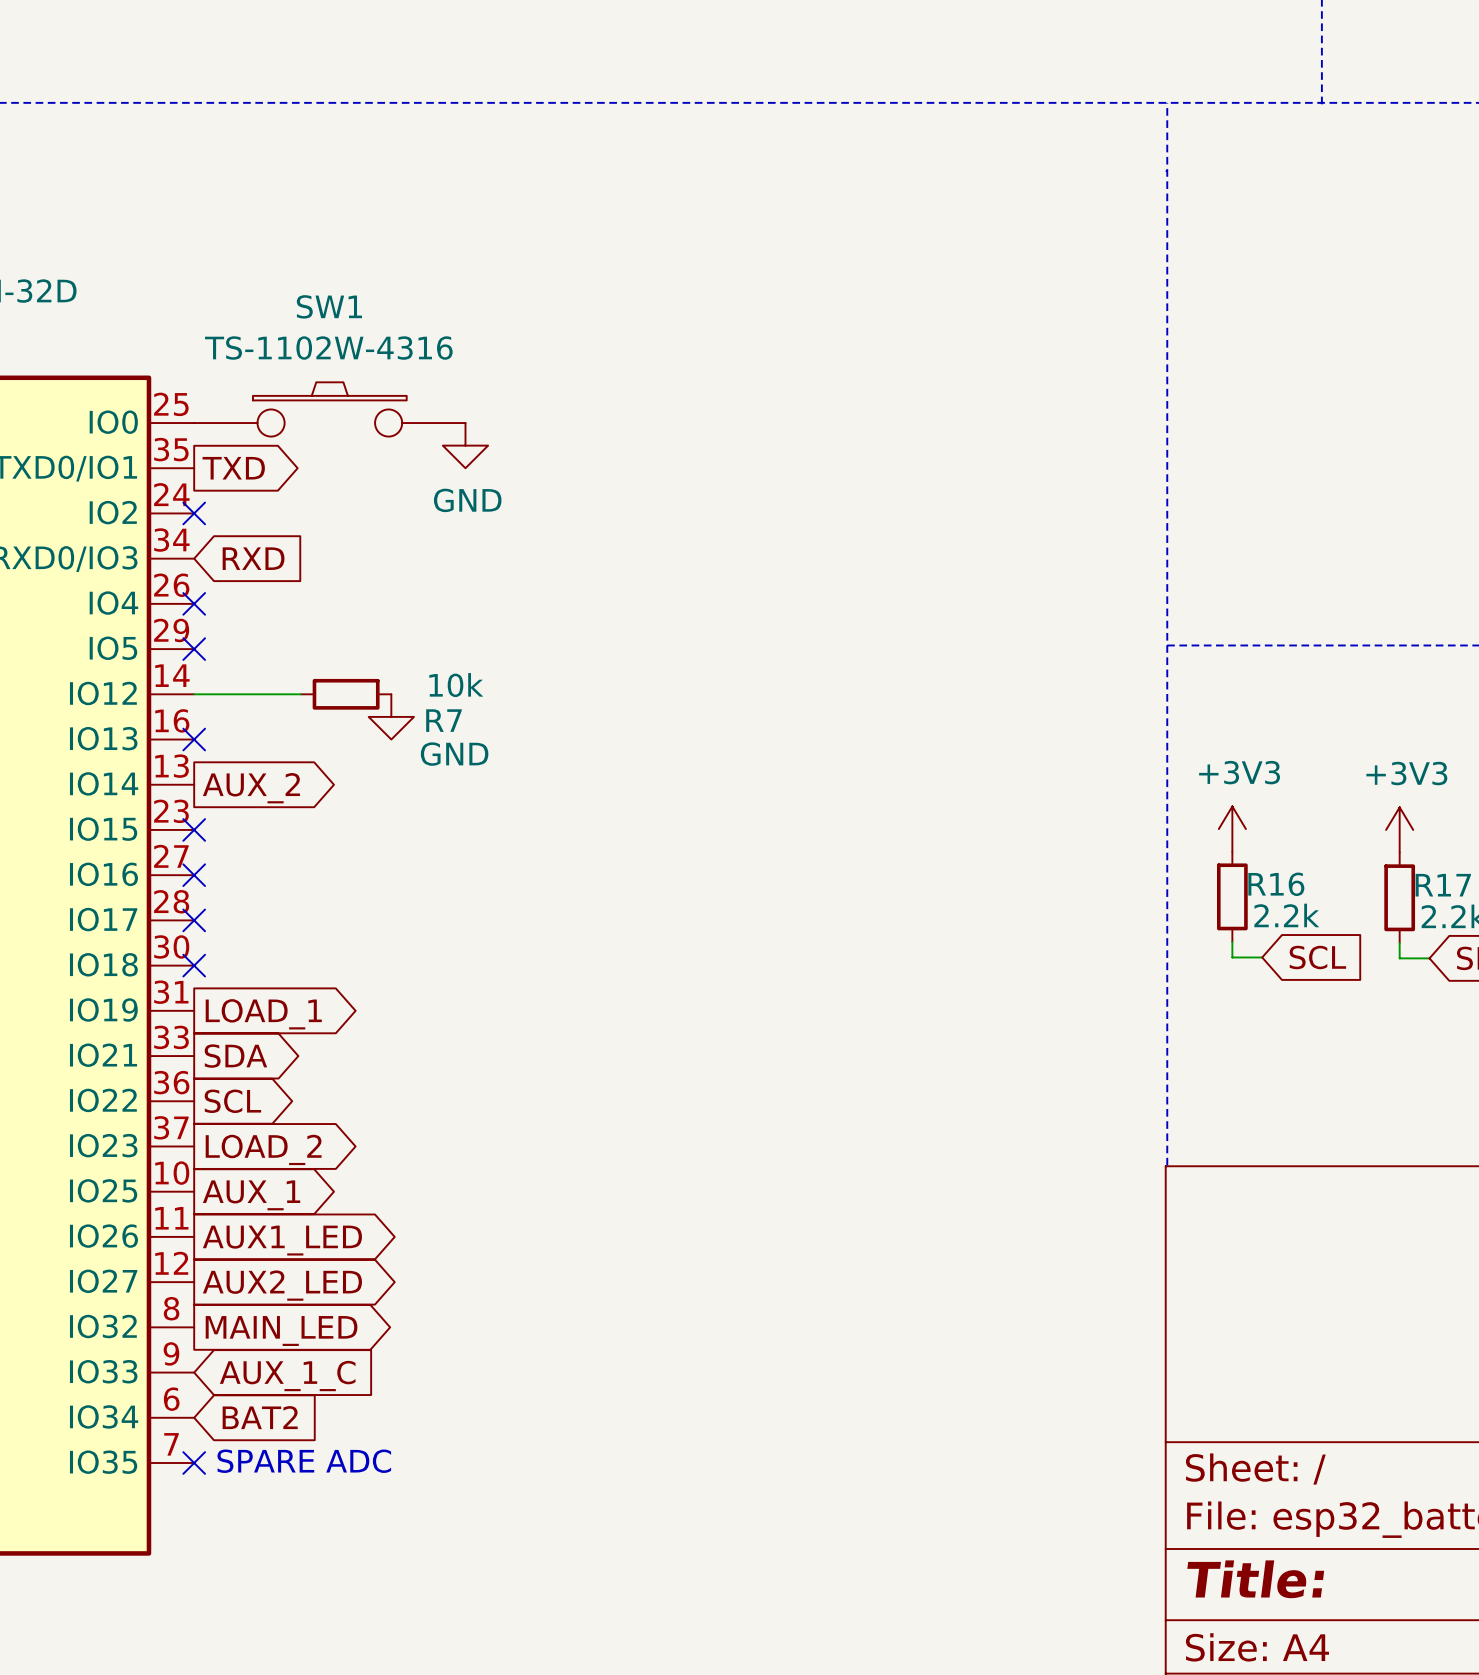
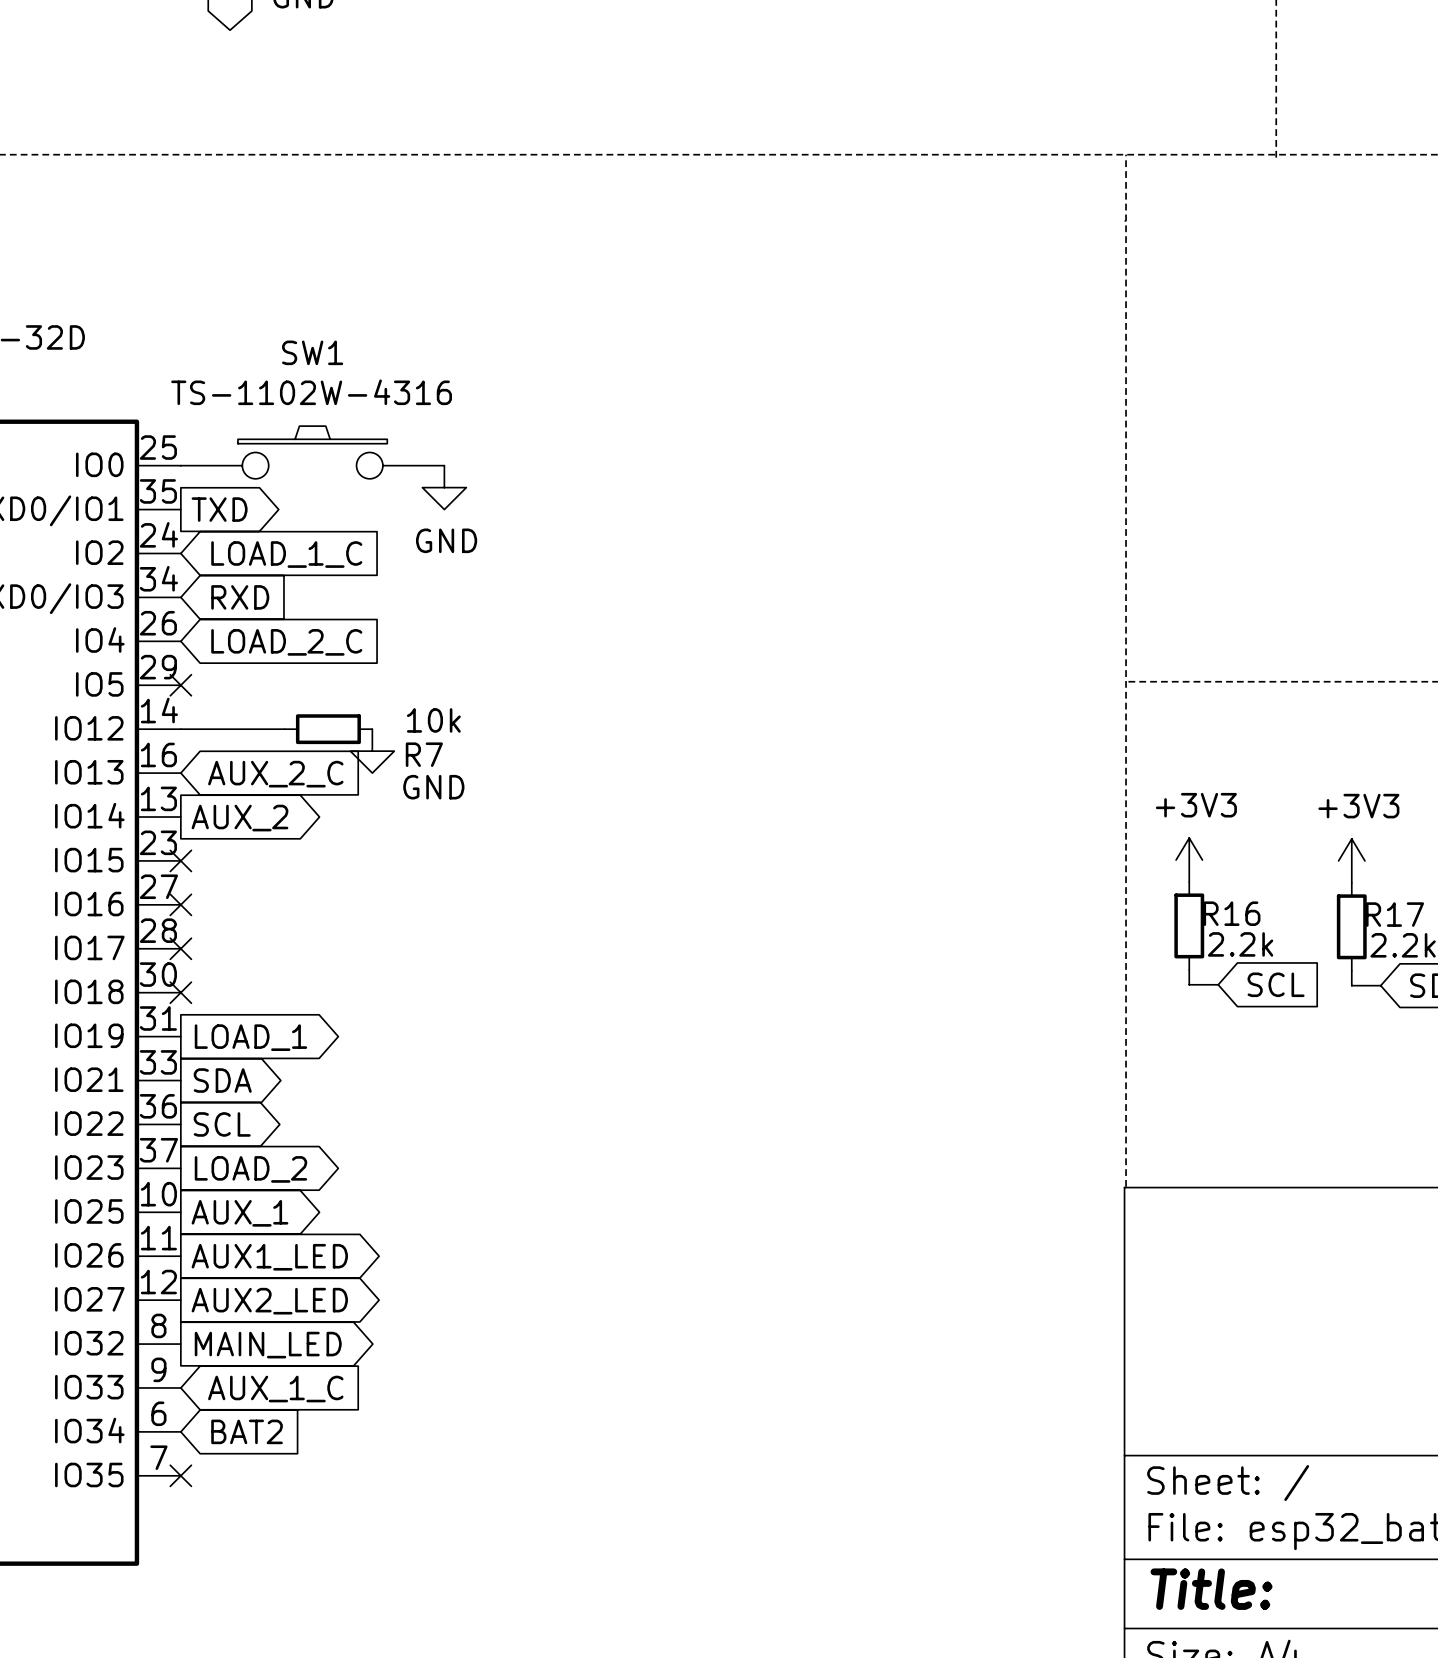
no-connect mark: (194, 513) -> none
global label: none -> LOAD_1_C (286, 554)
no-connect mark: (194, 603) -> none
global label: none -> LOAD_2_C (286, 642)
no-connect mark: (194, 739) -> none
global label: none -> AUX_2_C (275, 774)
text: SPARE ADC (304, 1461) -> none

